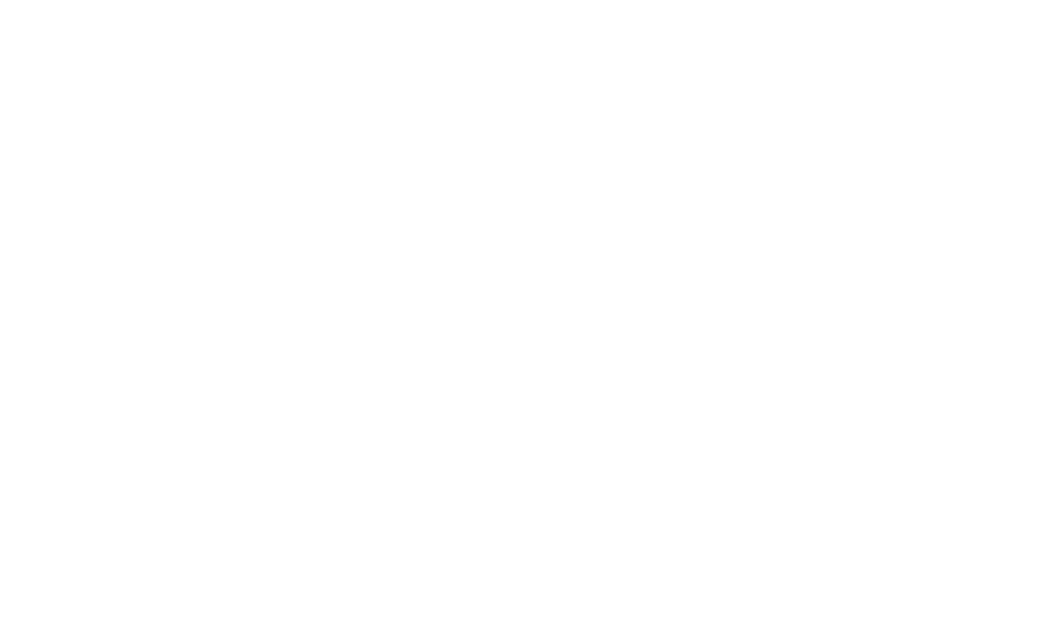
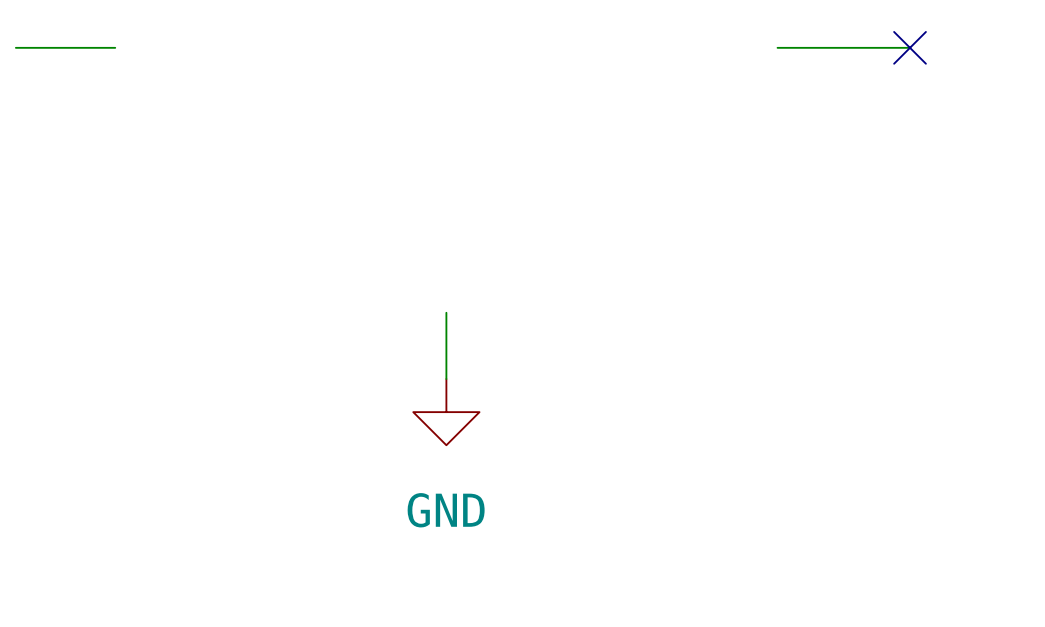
wire: none -> (15, 47) (115, 47)
wire: none -> (777, 47) (910, 47)
no-connect mark: none -> (910, 47)
wire: none -> (446, 312) (446, 379)
power symbol: none -> GND (446, 412)

